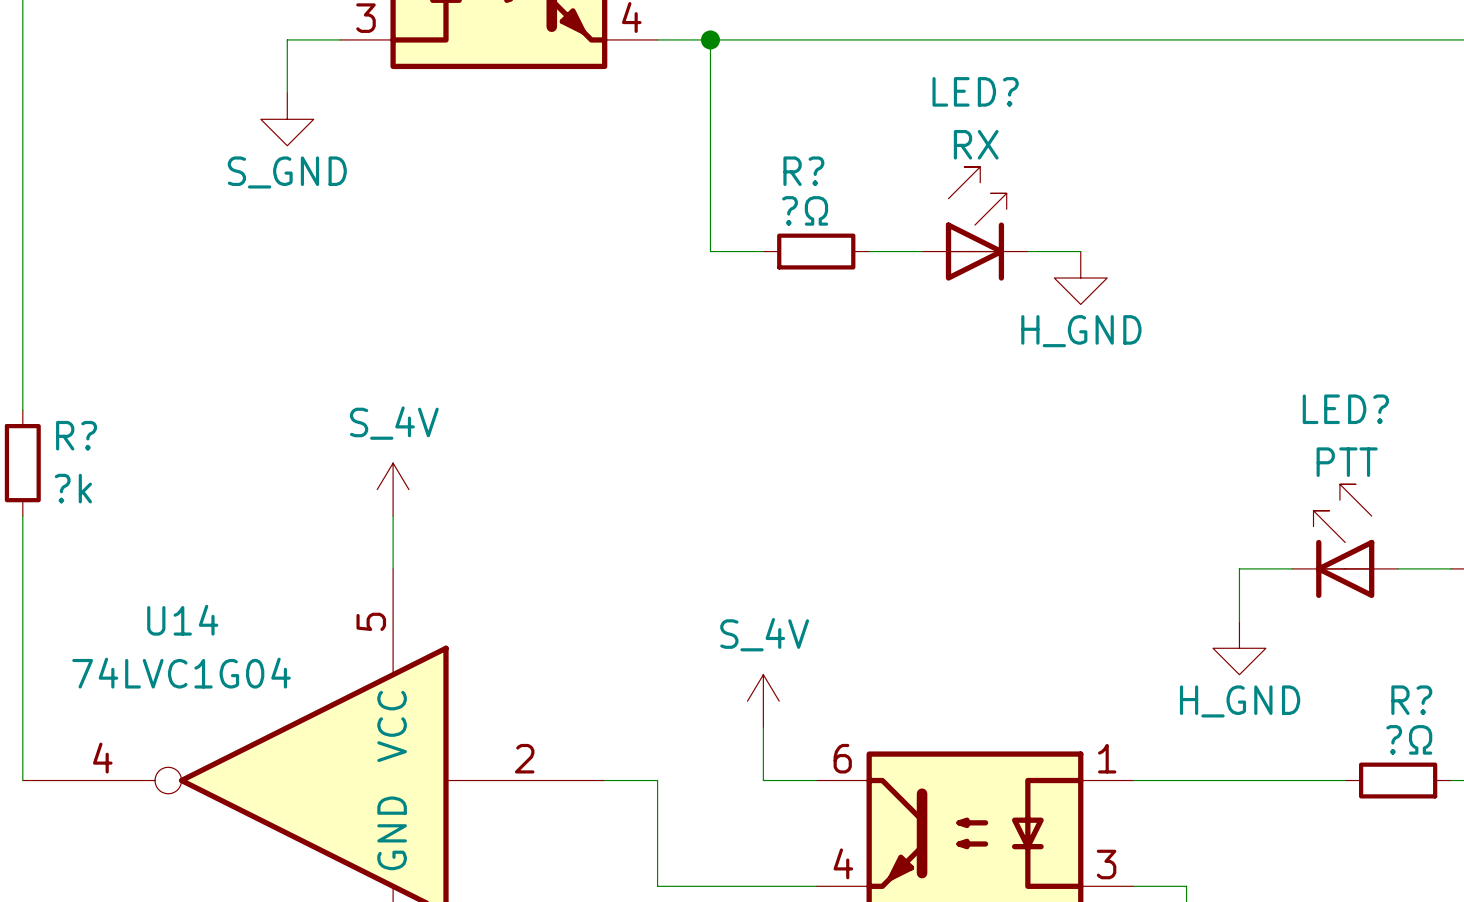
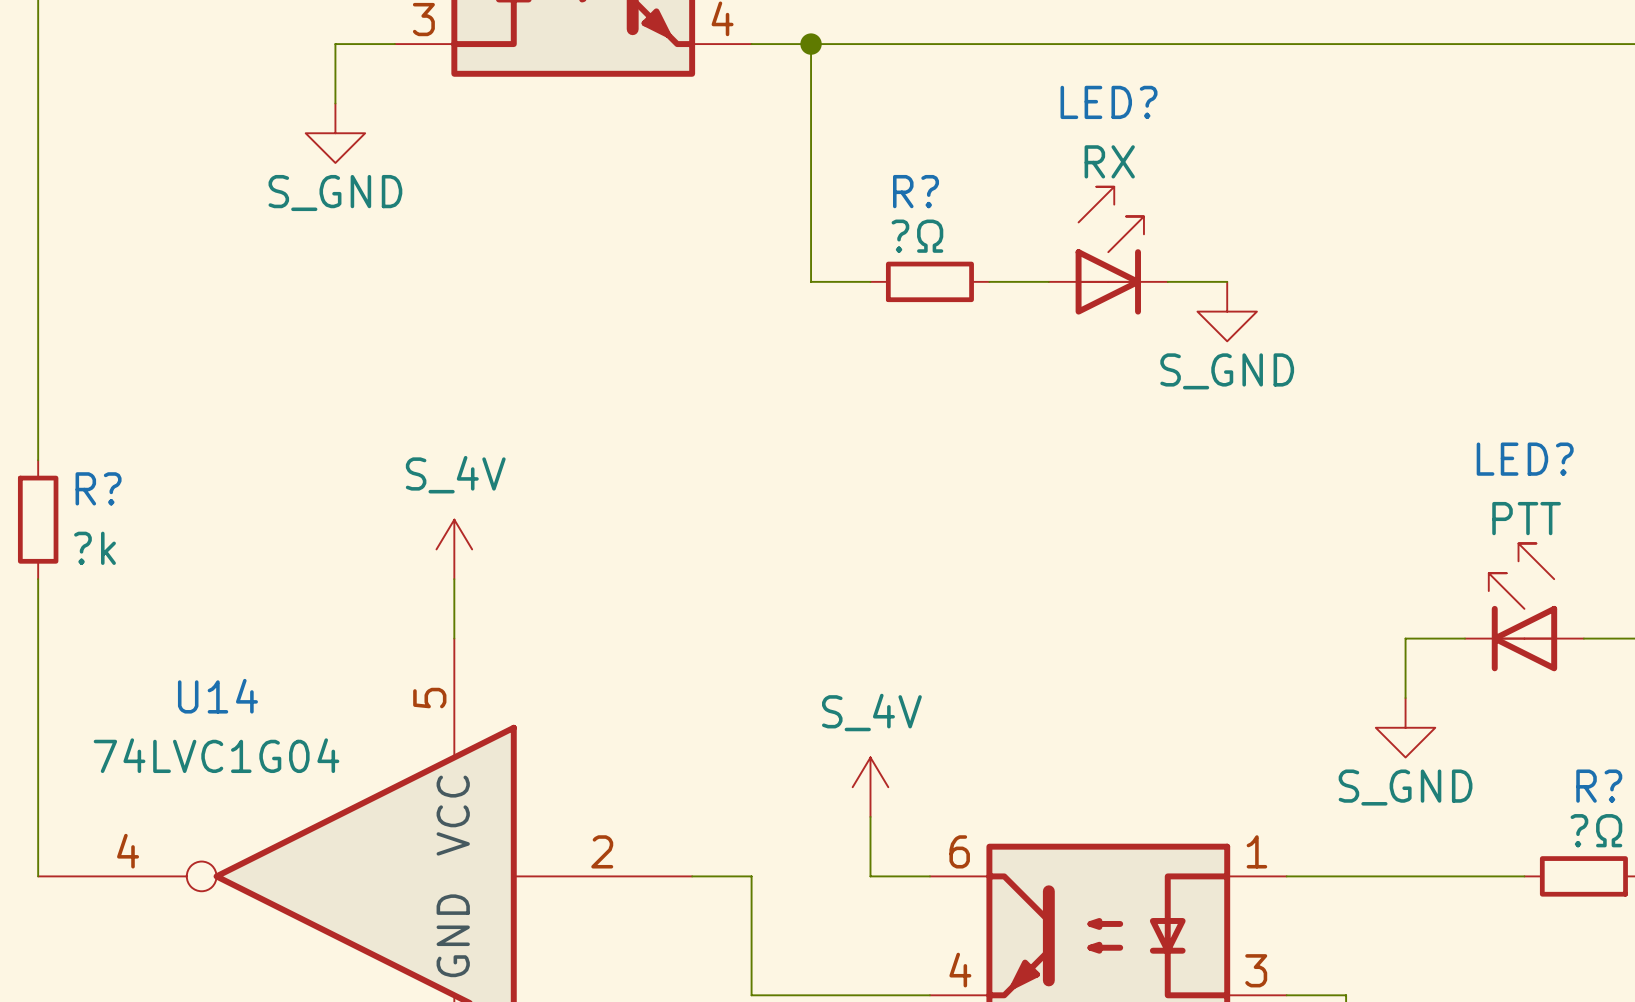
power symbol: H_GND (1080, 278) -> S_GND (1227, 311)
power symbol: H_GND (1239, 648) -> S_GND (1405, 727)

